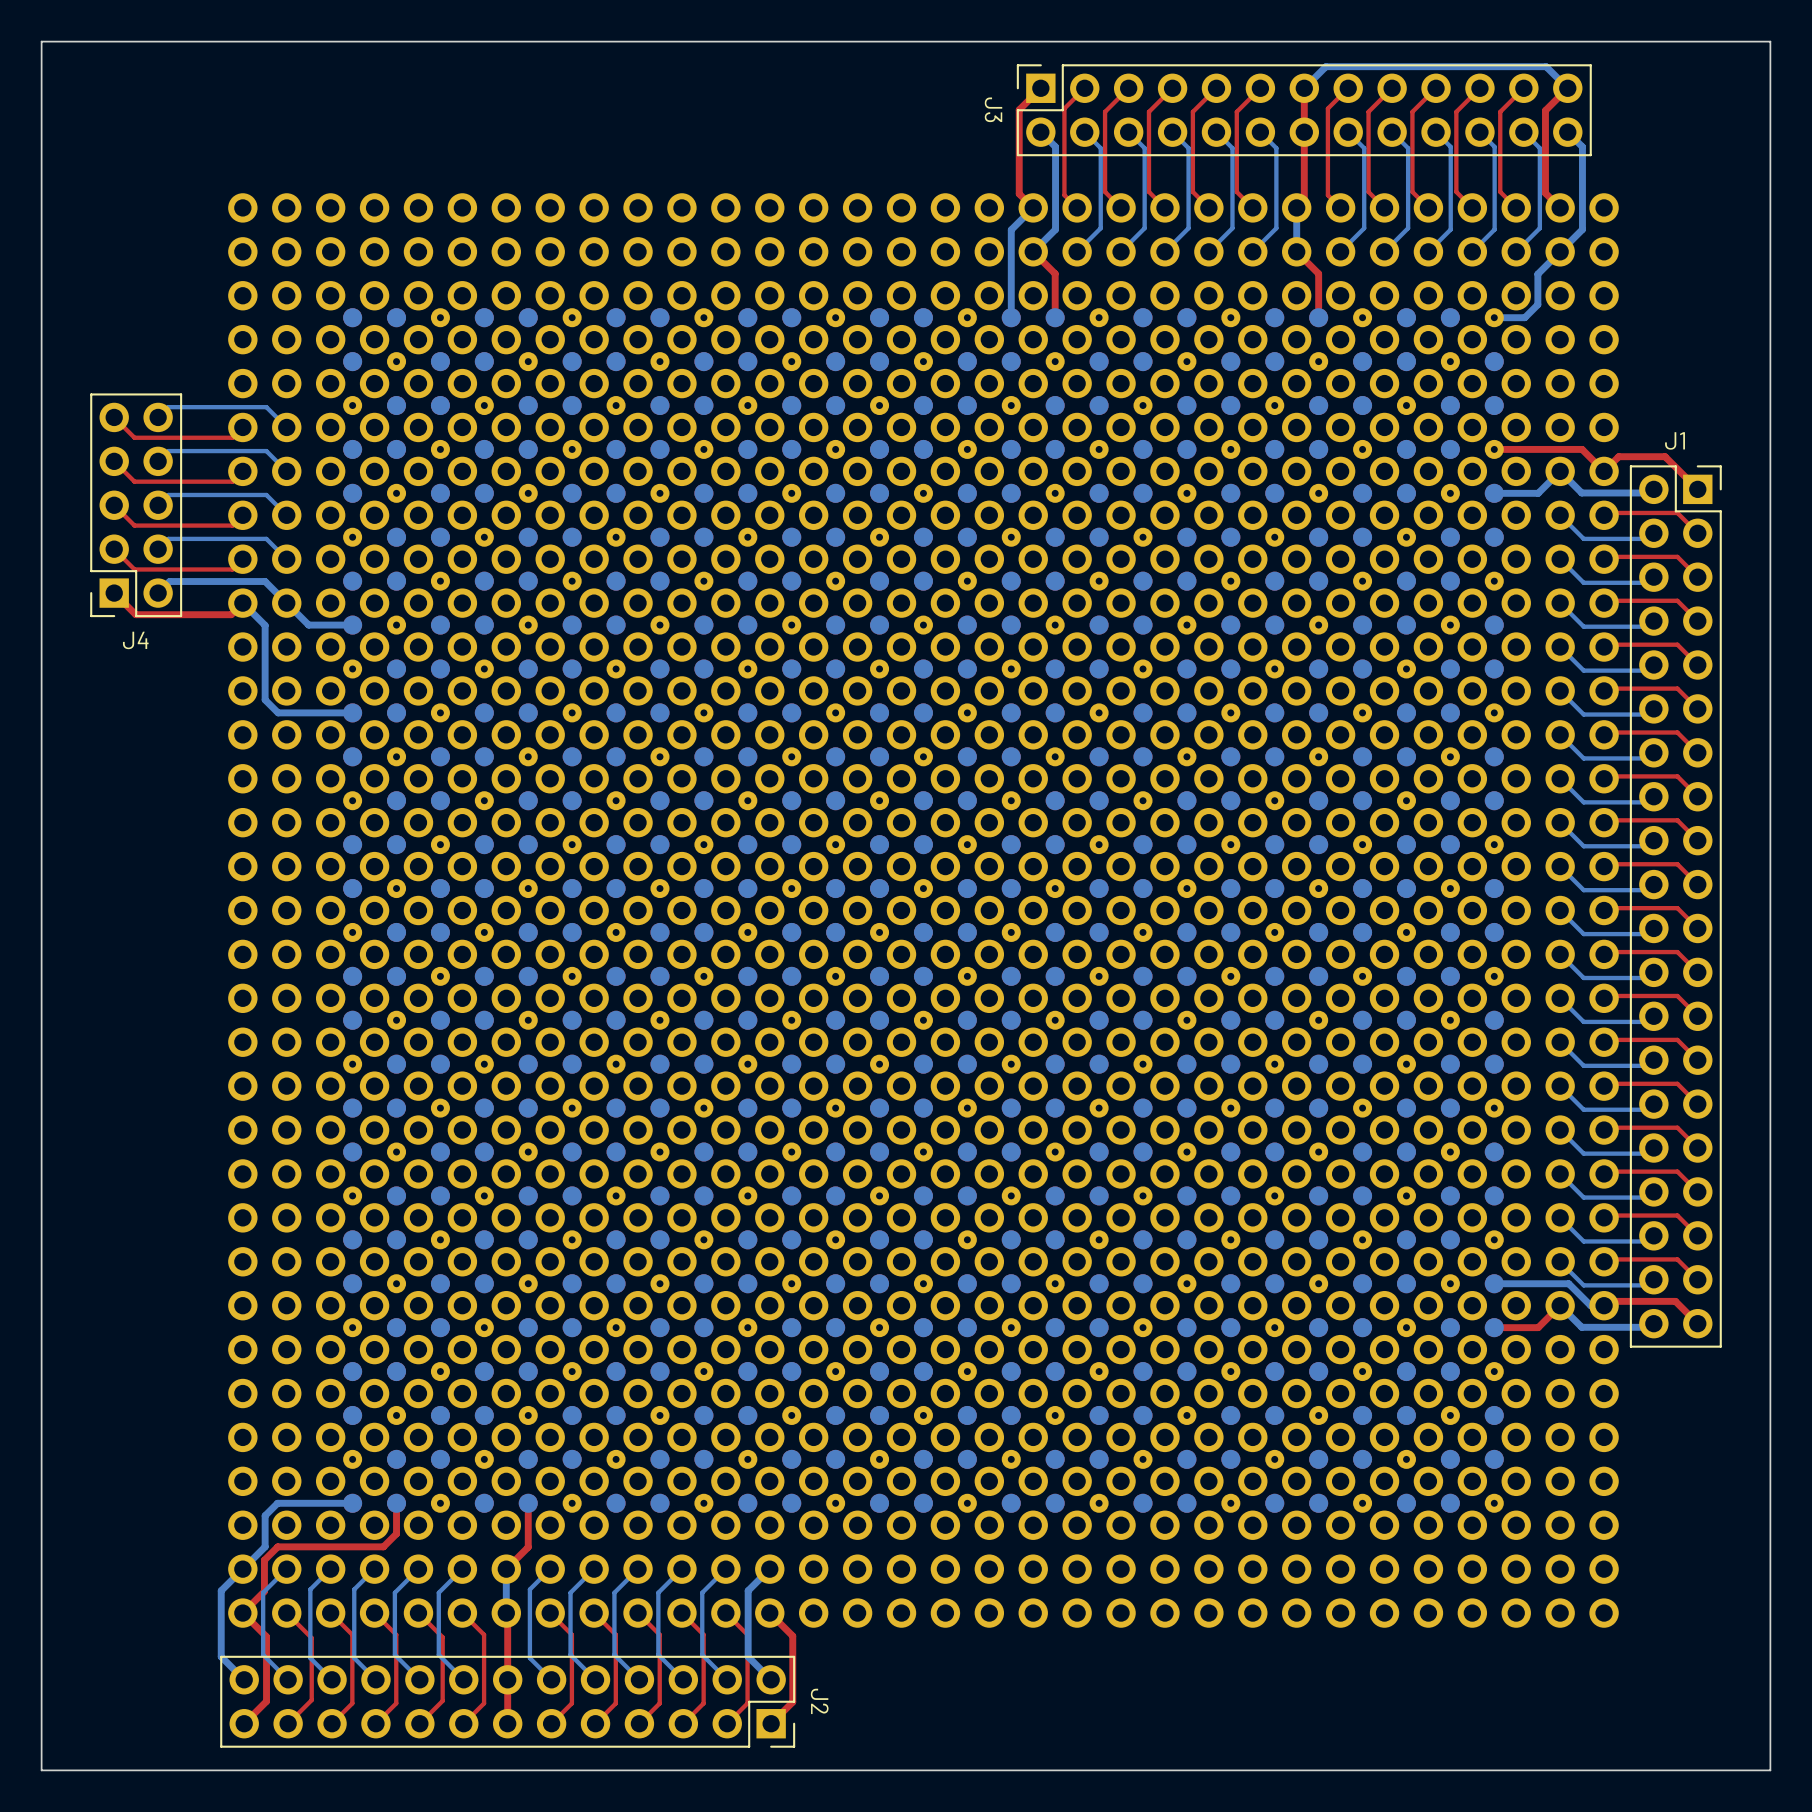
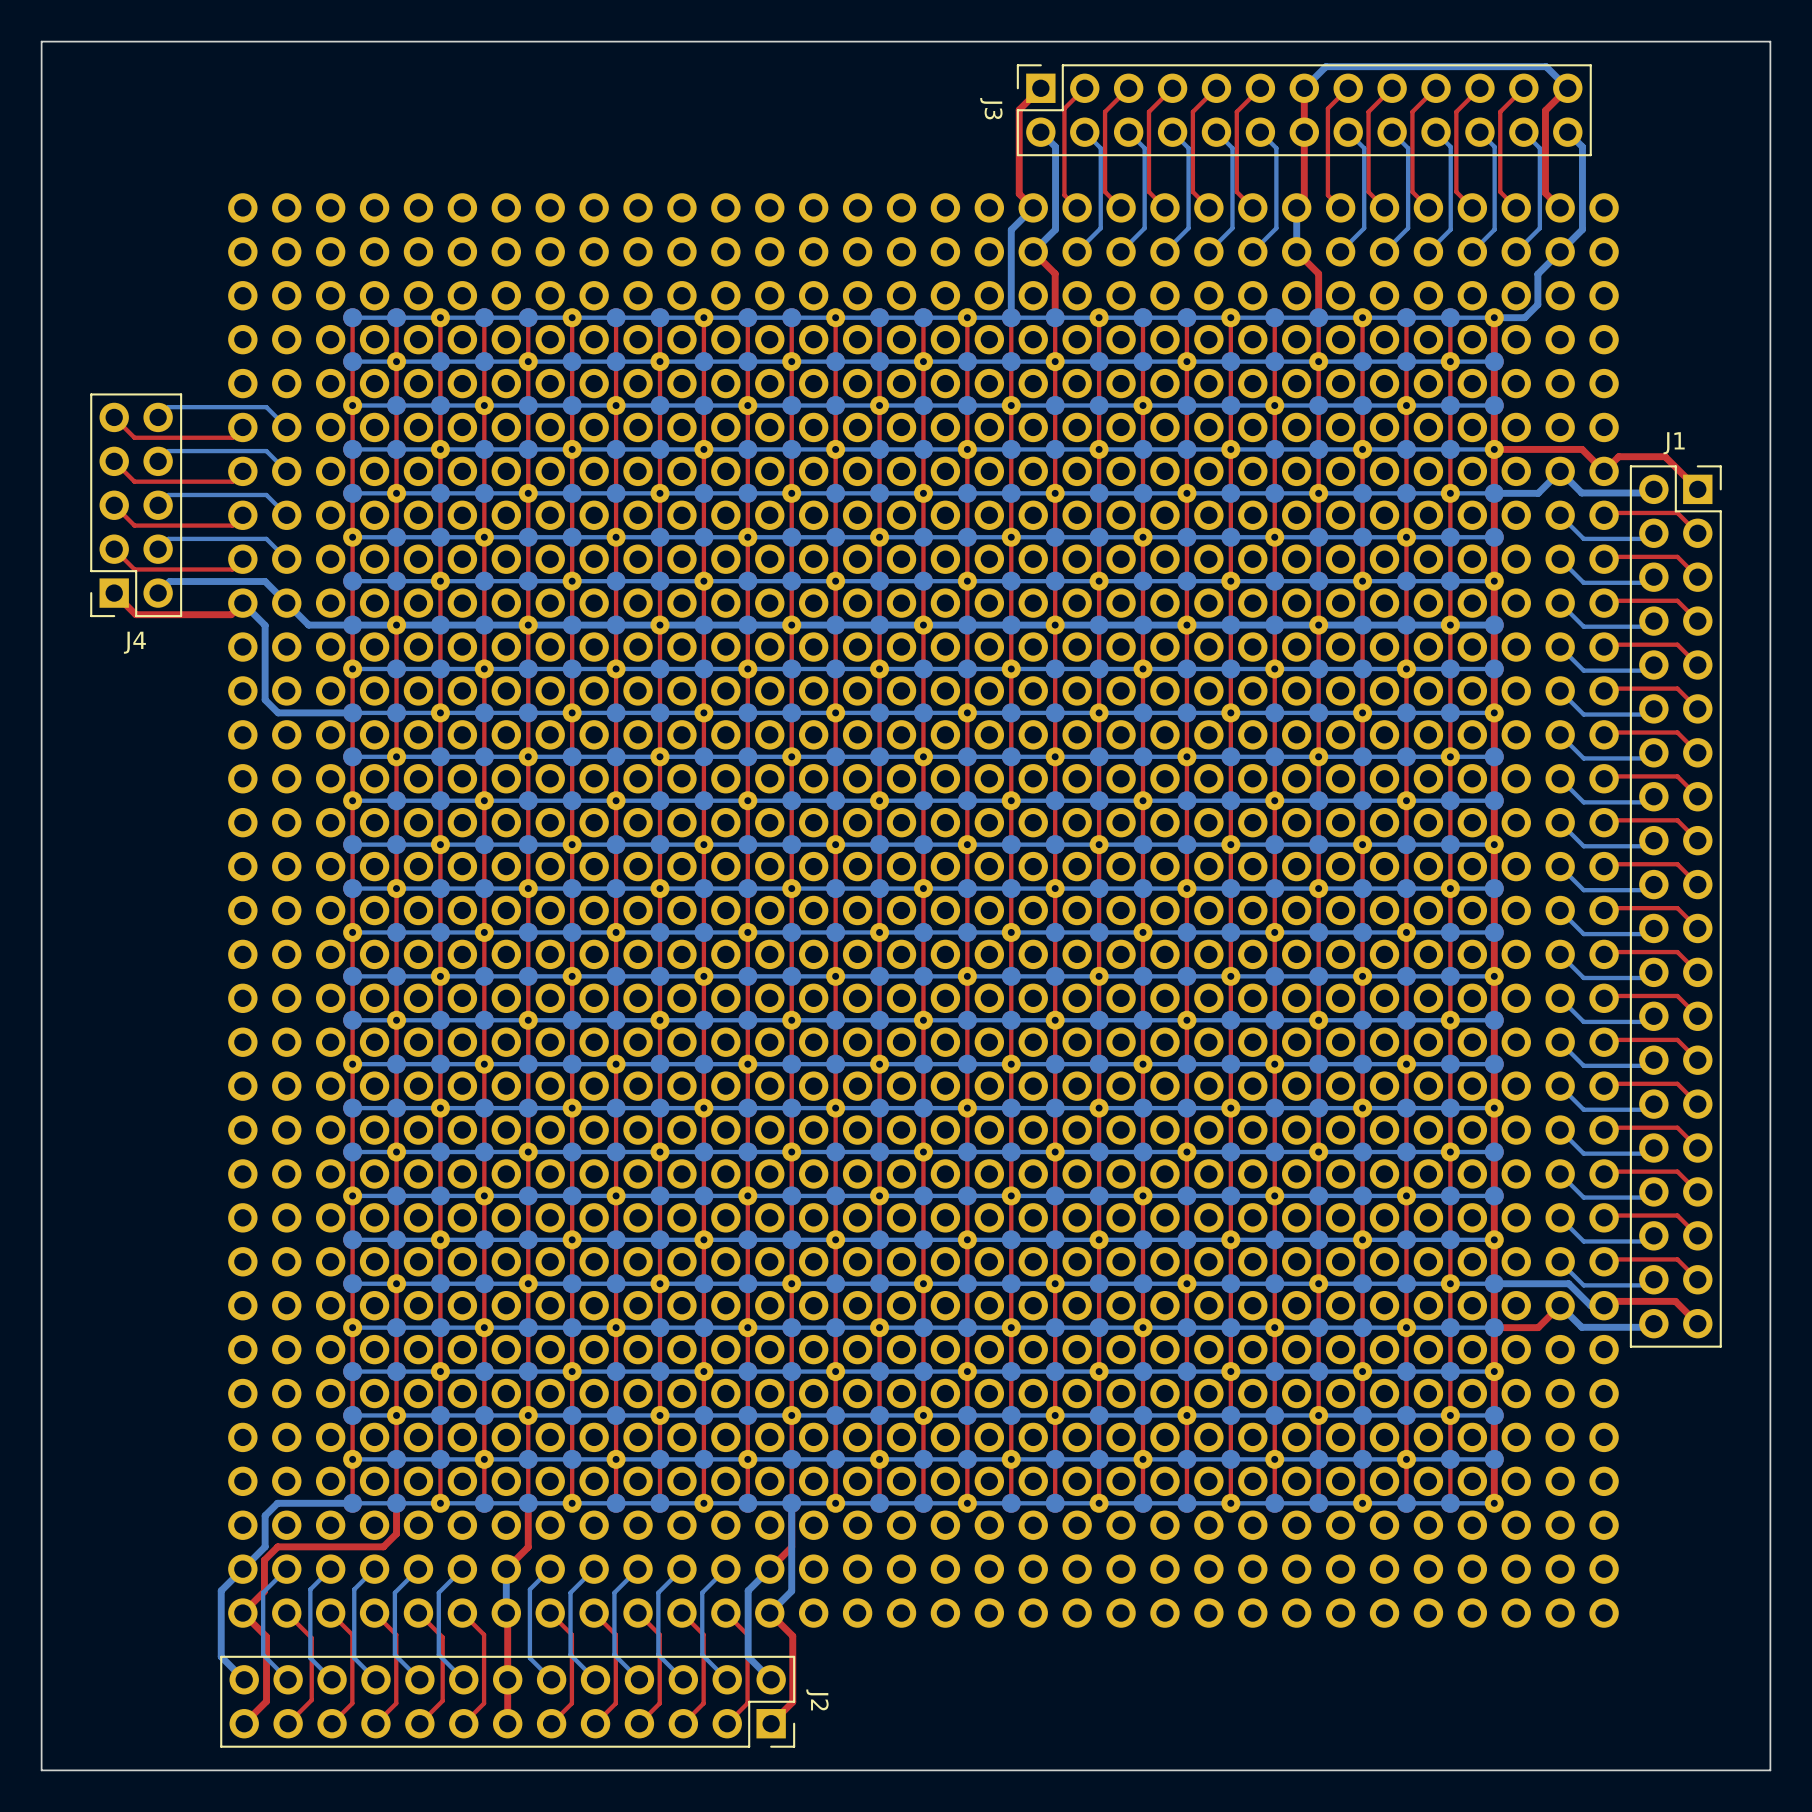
top track: none -> (352, 317) (352, 1503)
top track: none -> (396, 317) (396, 1503)
top track: none -> (440, 317) (440, 1503)
top track: none -> (484, 317) (484, 1503)
top track: none -> (528, 317) (528, 1503)
top track: none -> (572, 317) (572, 1503)
top track: none -> (616, 317) (616, 1503)
top track: none -> (659, 317) (659, 1503)
top track: none -> (703, 317) (703, 1503)
top track: none -> (747, 317) (747, 1503)
top track: none -> (791, 317) (791, 1547) (769, 1569)
top track: none -> (835, 317) (835, 1503)
top track: none -> (879, 317) (879, 1503)
top track: none -> (923, 317) (923, 1503)
top track: none -> (967, 317) (967, 1503)
top track: none -> (1011, 317) (1011, 1503)
top track: none -> (1055, 317) (1055, 1503)
top track: none -> (1099, 317) (1099, 1503)
top track: none -> (1143, 317) (1143, 1503)
top track: none -> (1186, 317) (1186, 1503)
top track: none -> (1230, 317) (1230, 1507)
top track: none -> (1274, 317) (1274, 1503)
top track: none -> (1318, 317) (1318, 1503)
top track: none -> (1362, 317) (1362, 1503)
top track: none -> (1406, 317) (1406, 1503)
top track: none -> (1450, 317) (1450, 1503)
top track: none -> (1494, 317) (1494, 1503)
bottom track: none -> (1494, 317) (352, 317)
bottom track: none -> (1494, 361) (352, 361)
bottom track: none -> (1494, 405) (352, 405)
bottom track: none -> (1494, 449) (352, 449)
bottom track: none -> (1494, 493) (352, 493)
bottom track: none -> (1494, 537) (352, 537)
bottom track: none -> (1494, 581) (352, 581)
bottom track: none -> (1494, 625) (352, 625)
bottom track: none -> (1494, 668) (352, 668)
bottom track: none -> (1494, 712) (352, 712)
bottom track: none -> (1494, 756) (352, 756)
bottom track: none -> (1494, 800) (352, 800)
bottom track: none -> (1494, 844) (352, 844)
bottom track: none -> (1494, 888) (352, 888)
bottom track: none -> (1494, 932) (352, 932)
bottom track: none -> (1494, 976) (352, 976)
bottom track: none -> (1494, 1020) (352, 1020)
bottom track: none -> (1494, 1064) (352, 1064)
bottom track: none -> (1494, 1108) (352, 1108)
bottom track: none -> (1494, 1152) (352, 1152)
bottom track: none -> (1494, 1195) (352, 1195)
bottom track: none -> (1494, 1239) (352, 1239)
bottom track: none -> (1494, 1283) (352, 1283)
bottom track: none -> (1494, 1327) (352, 1327)
bottom track: none -> (1494, 1371) (352, 1371)
bottom track: none -> (1494, 1415) (352, 1415)
bottom track: none -> (1494, 1459) (352, 1459)
bottom track: none -> (791, 1503) (791, 1591) (769, 1613)
bottom track: none -> (1494, 1503) (352, 1503)

